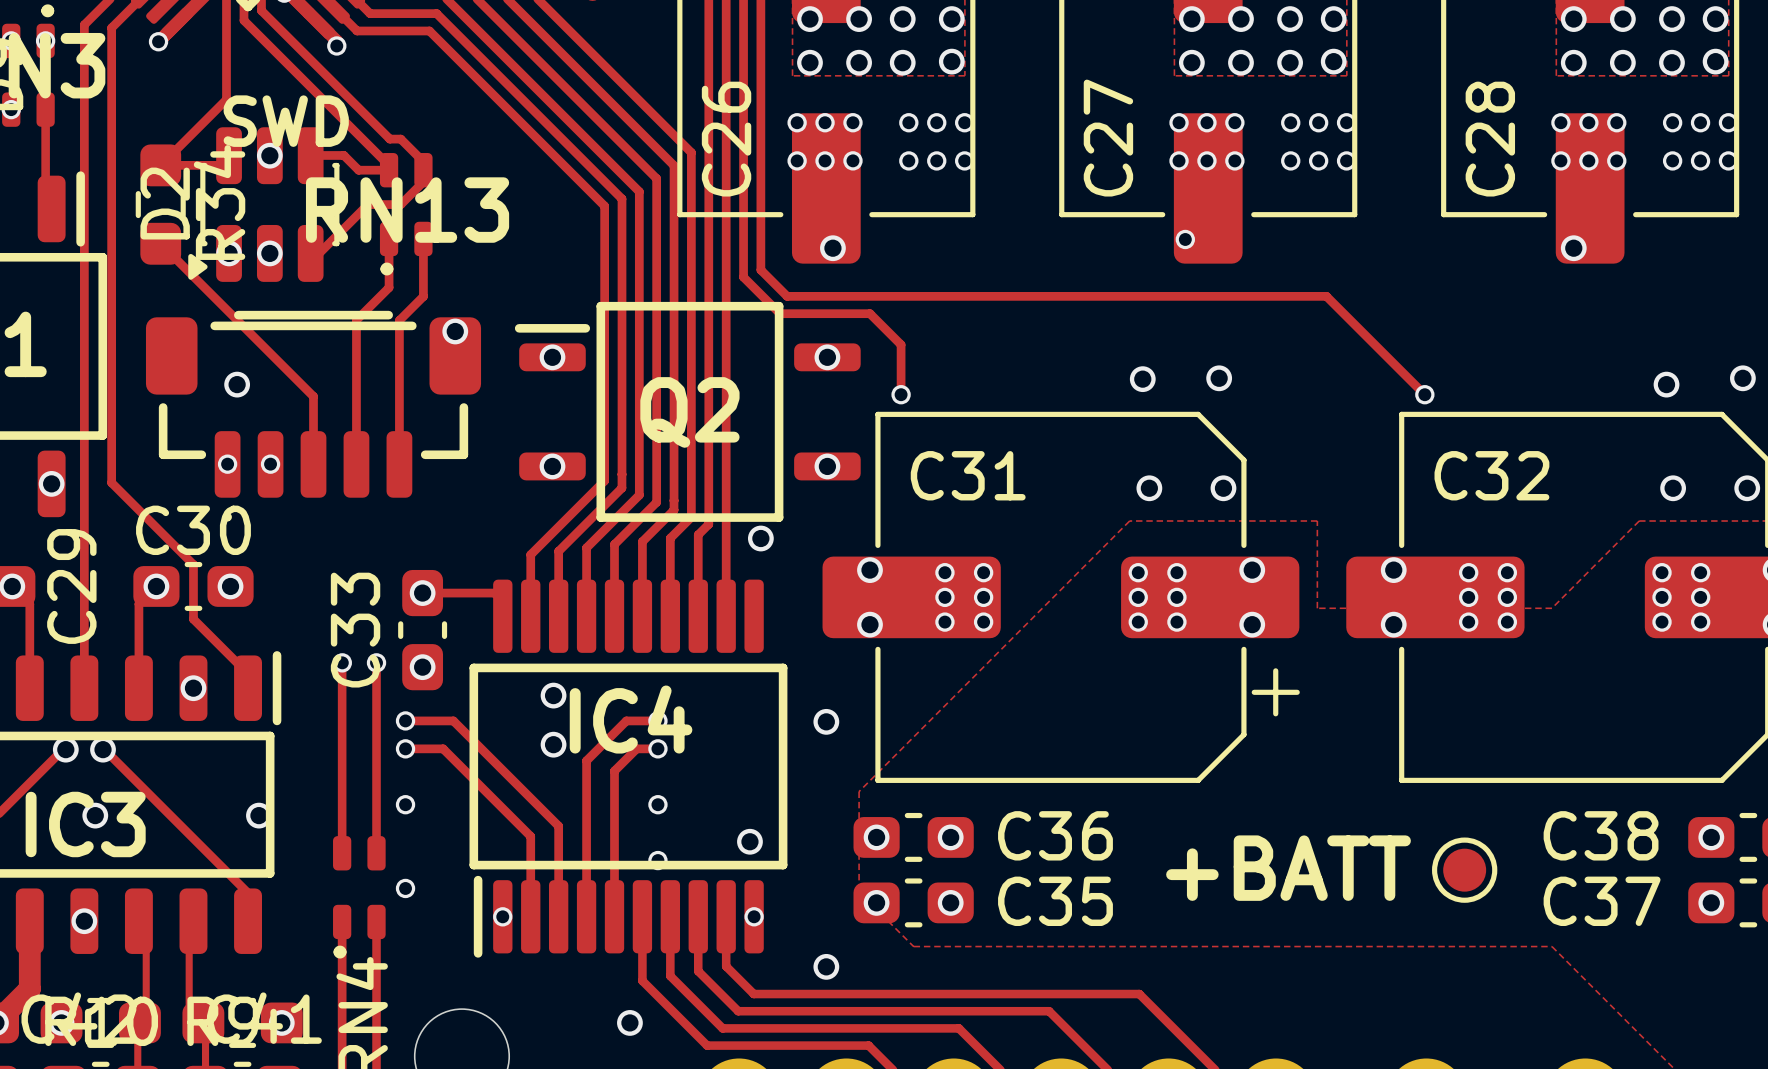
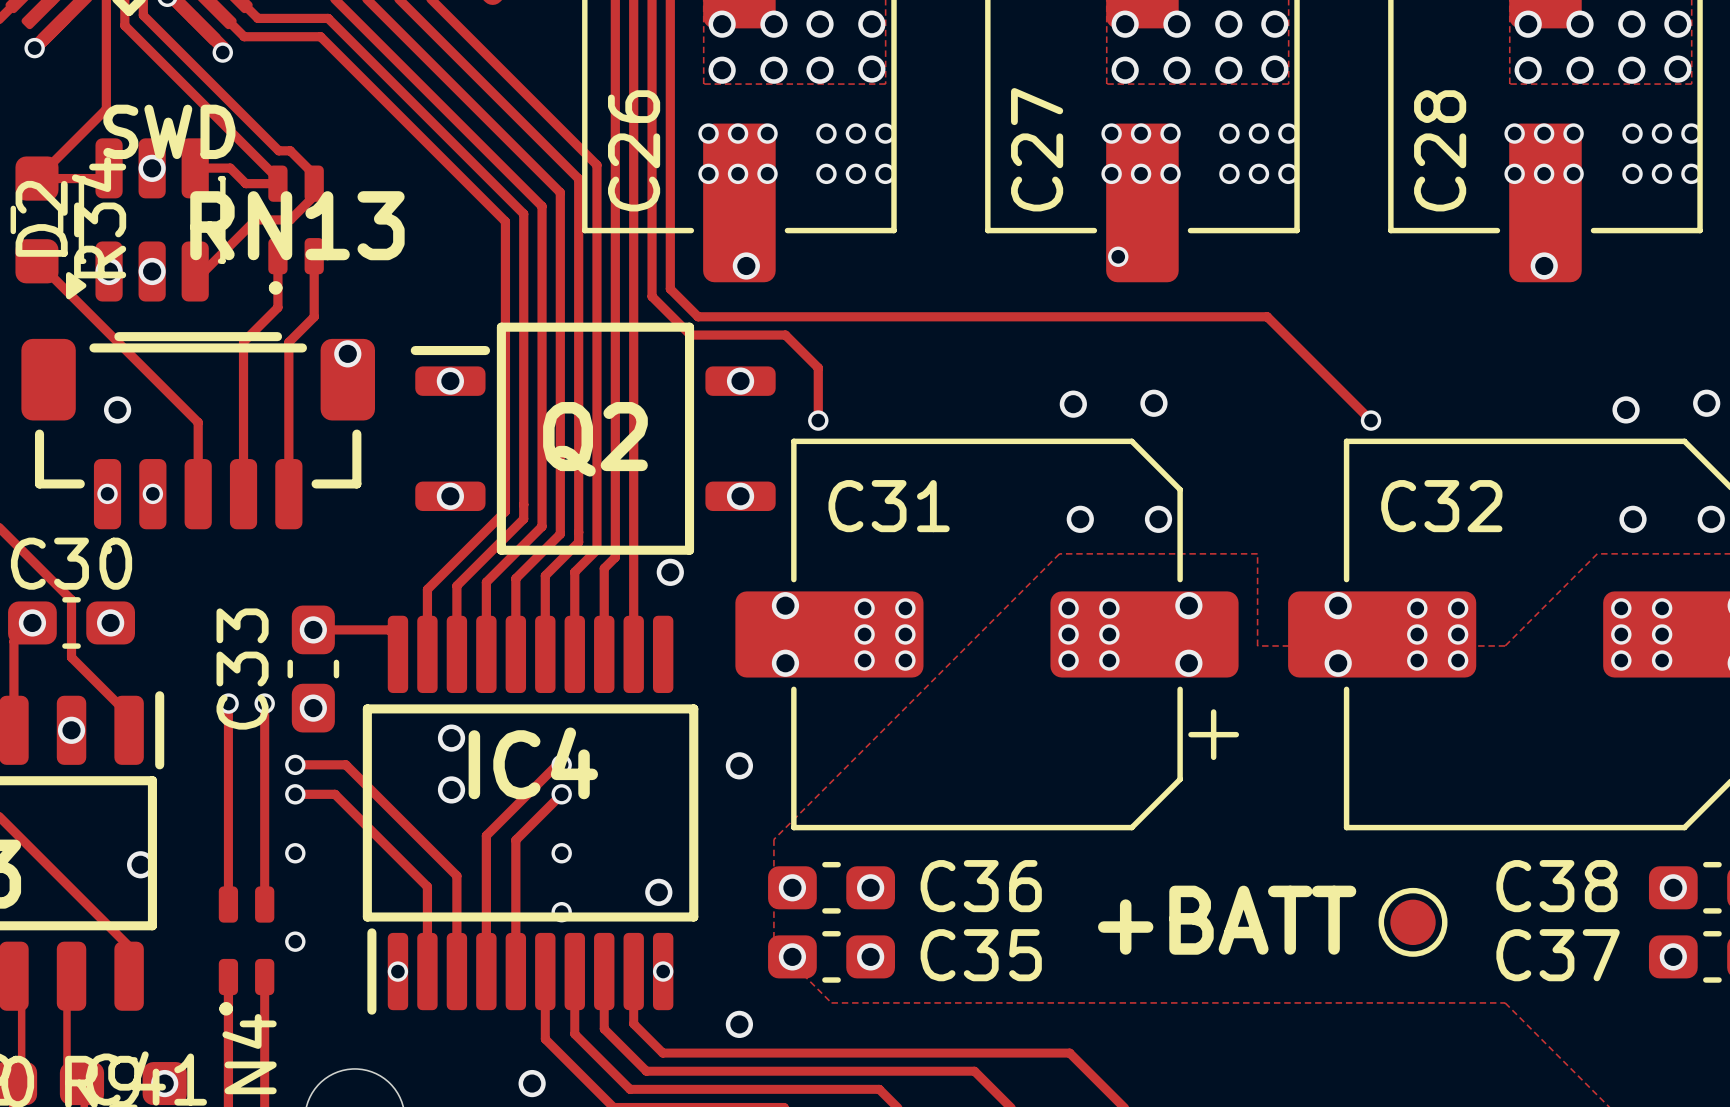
via position: (1573, 248) -> (1544, 265)
track: (653, 720) (626, 720) (586, 760) (586, 788) -> (557, 764) (486, 835)
track: (657, 748) (636, 748) (614, 771) (614, 792) -> (561, 794) (515, 840)

